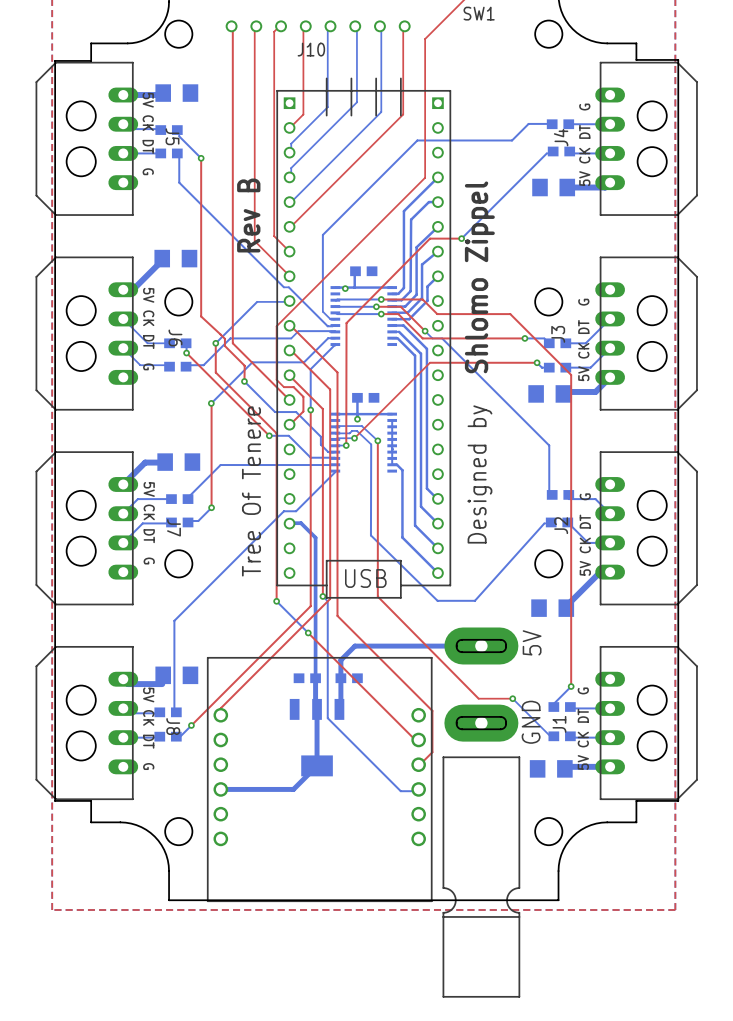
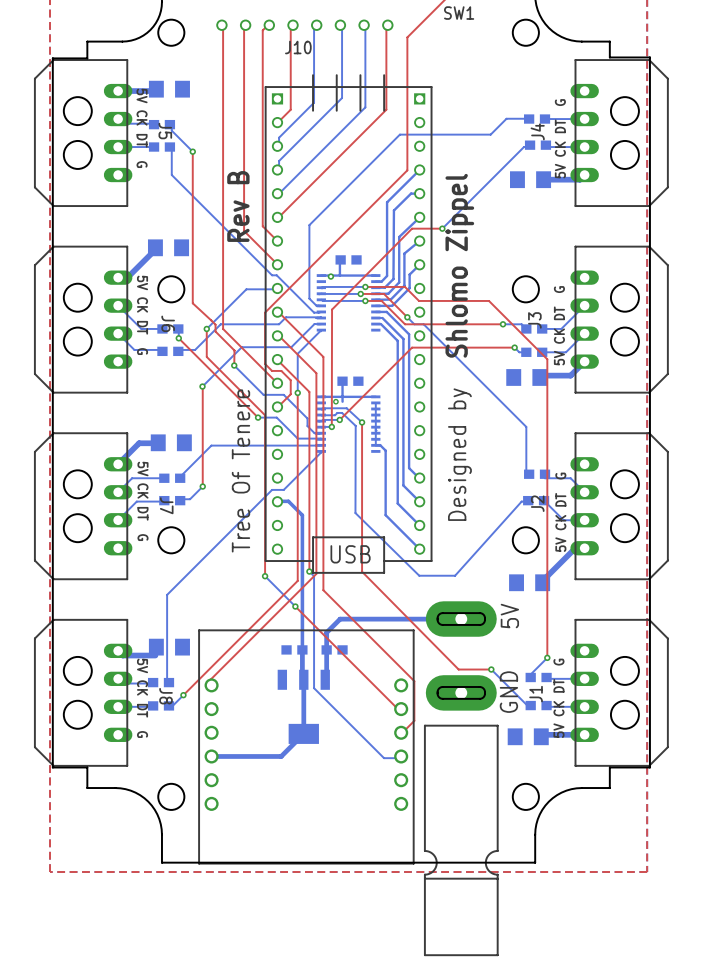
via: none -> (335, 401)
via: (357, 419) -> none

